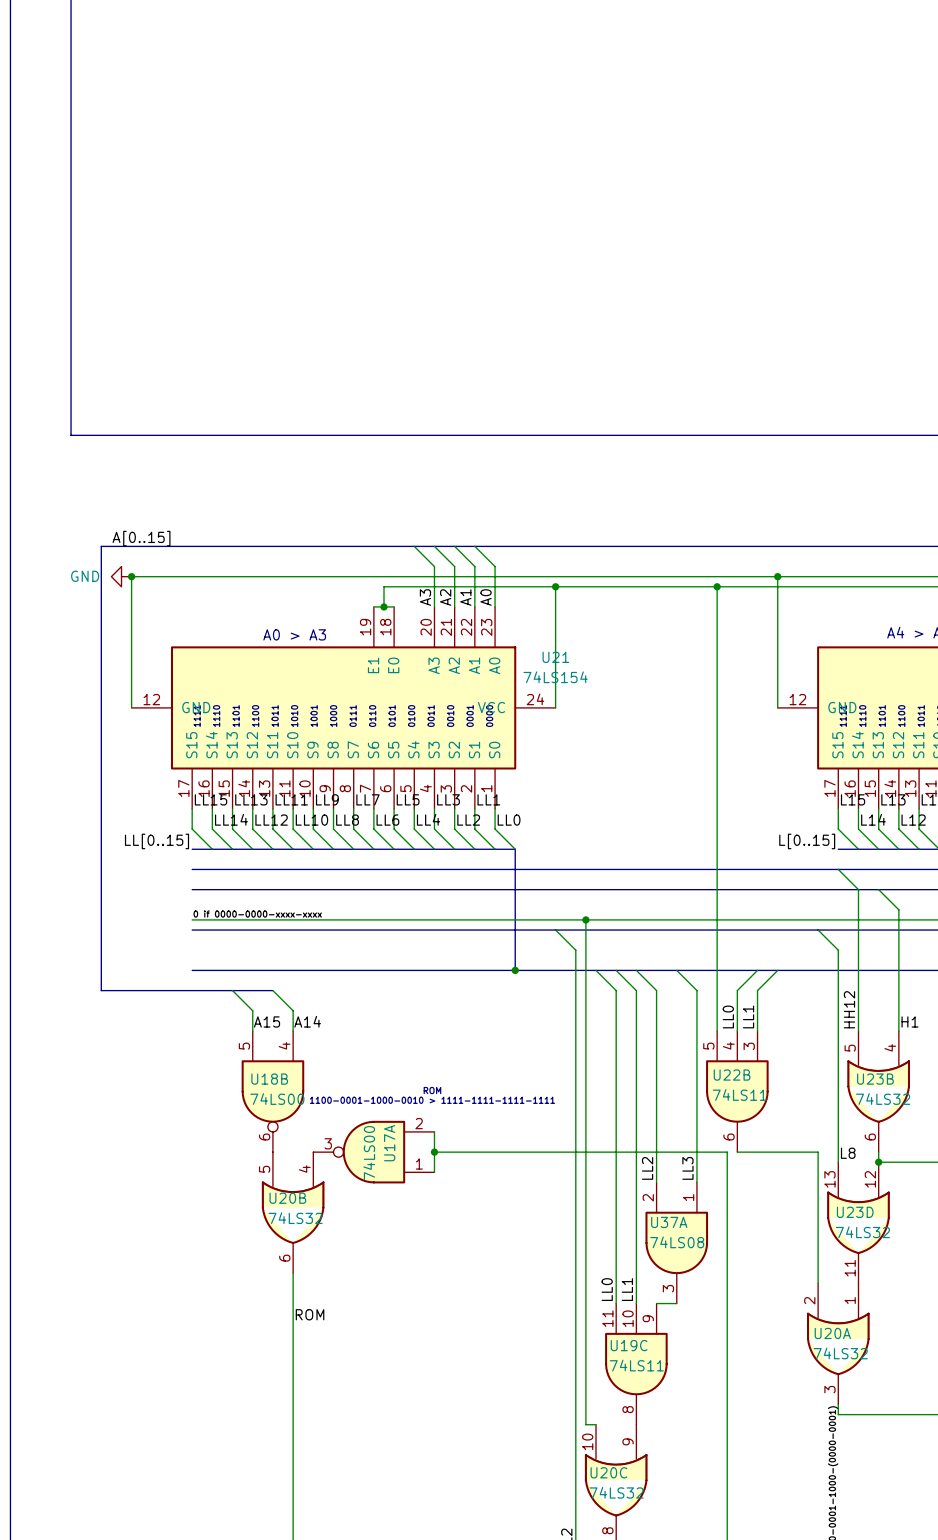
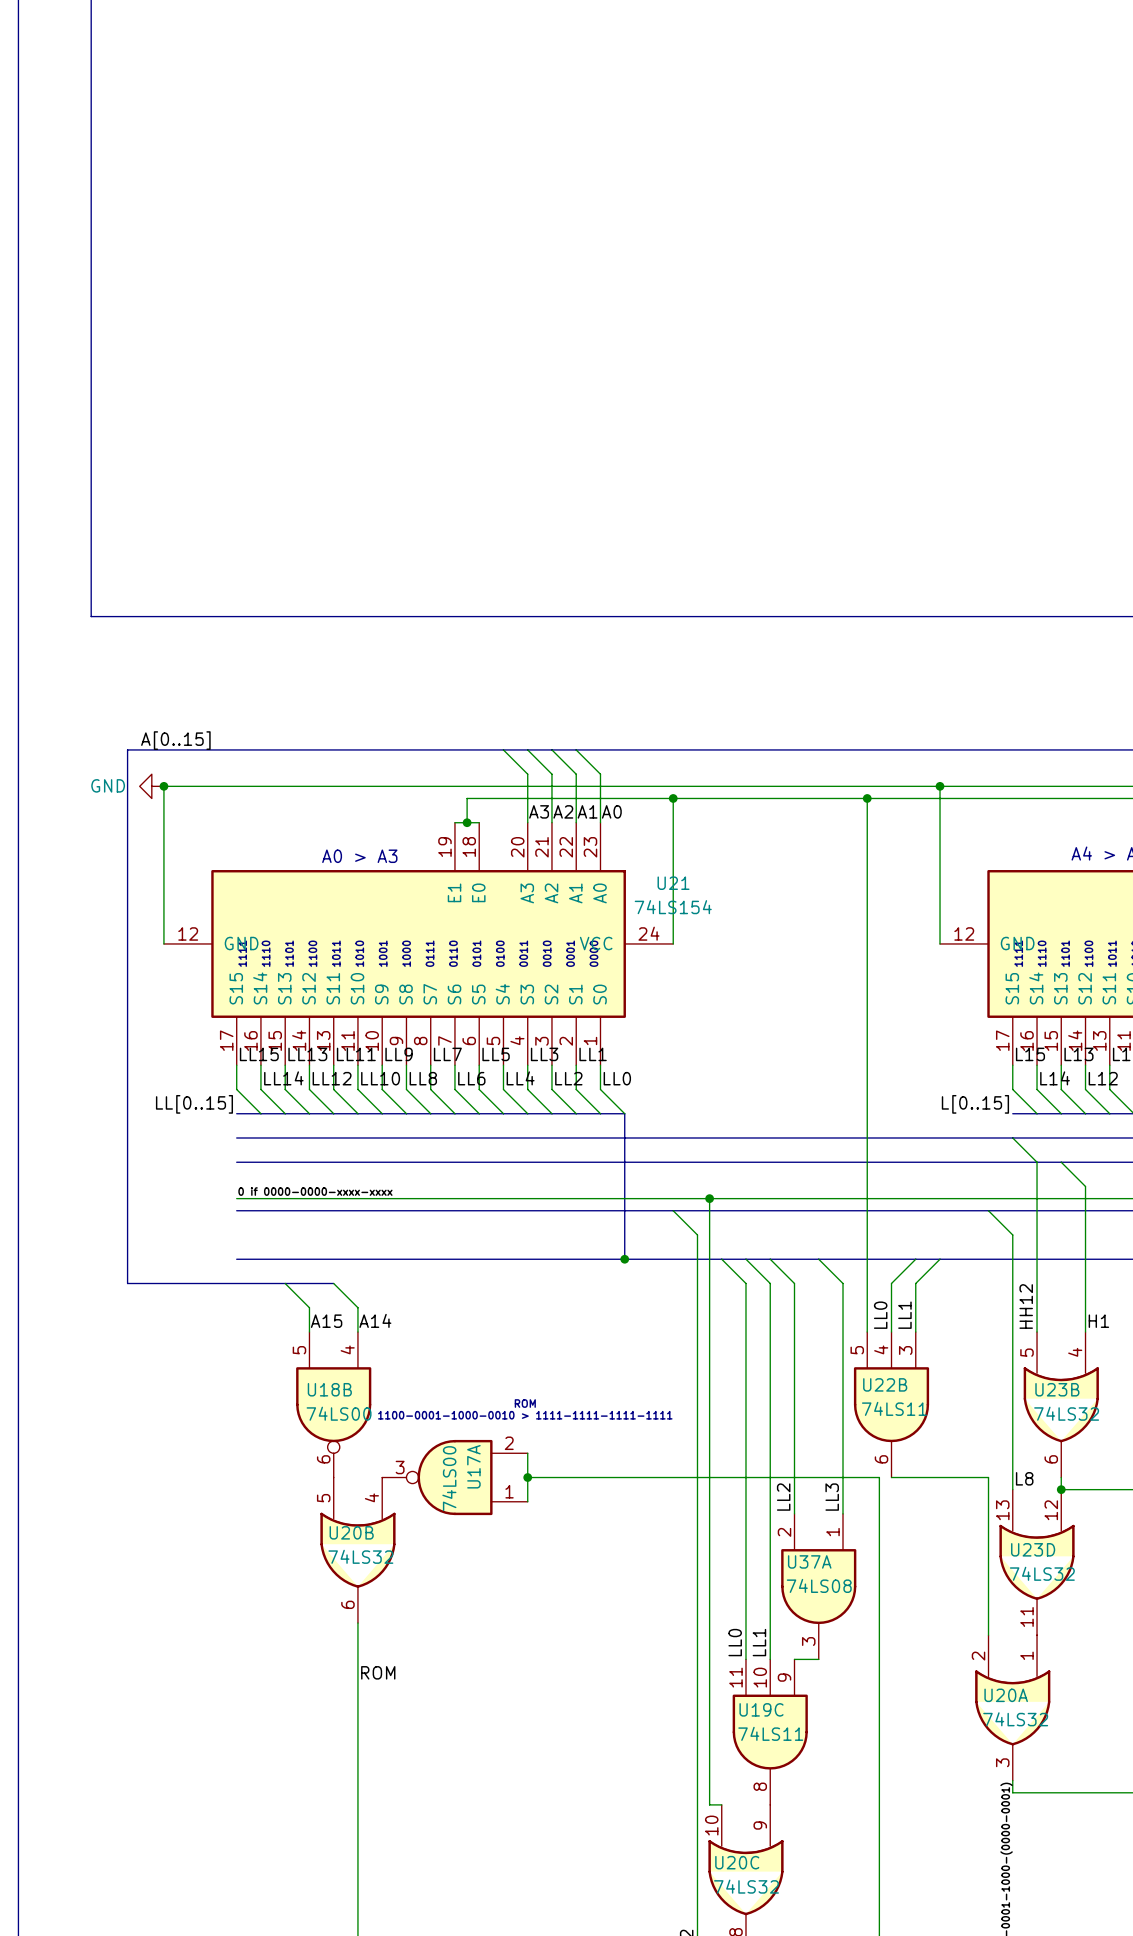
label rotation: 0° (425, 597) -> 90° clockwise (539, 811)
label rotation: 0° (445, 597) -> 90° clockwise (563, 811)
label rotation: 0° (465, 597) -> 90° clockwise (587, 811)
label rotation: 0° (486, 597) -> 90° clockwise (611, 811)

